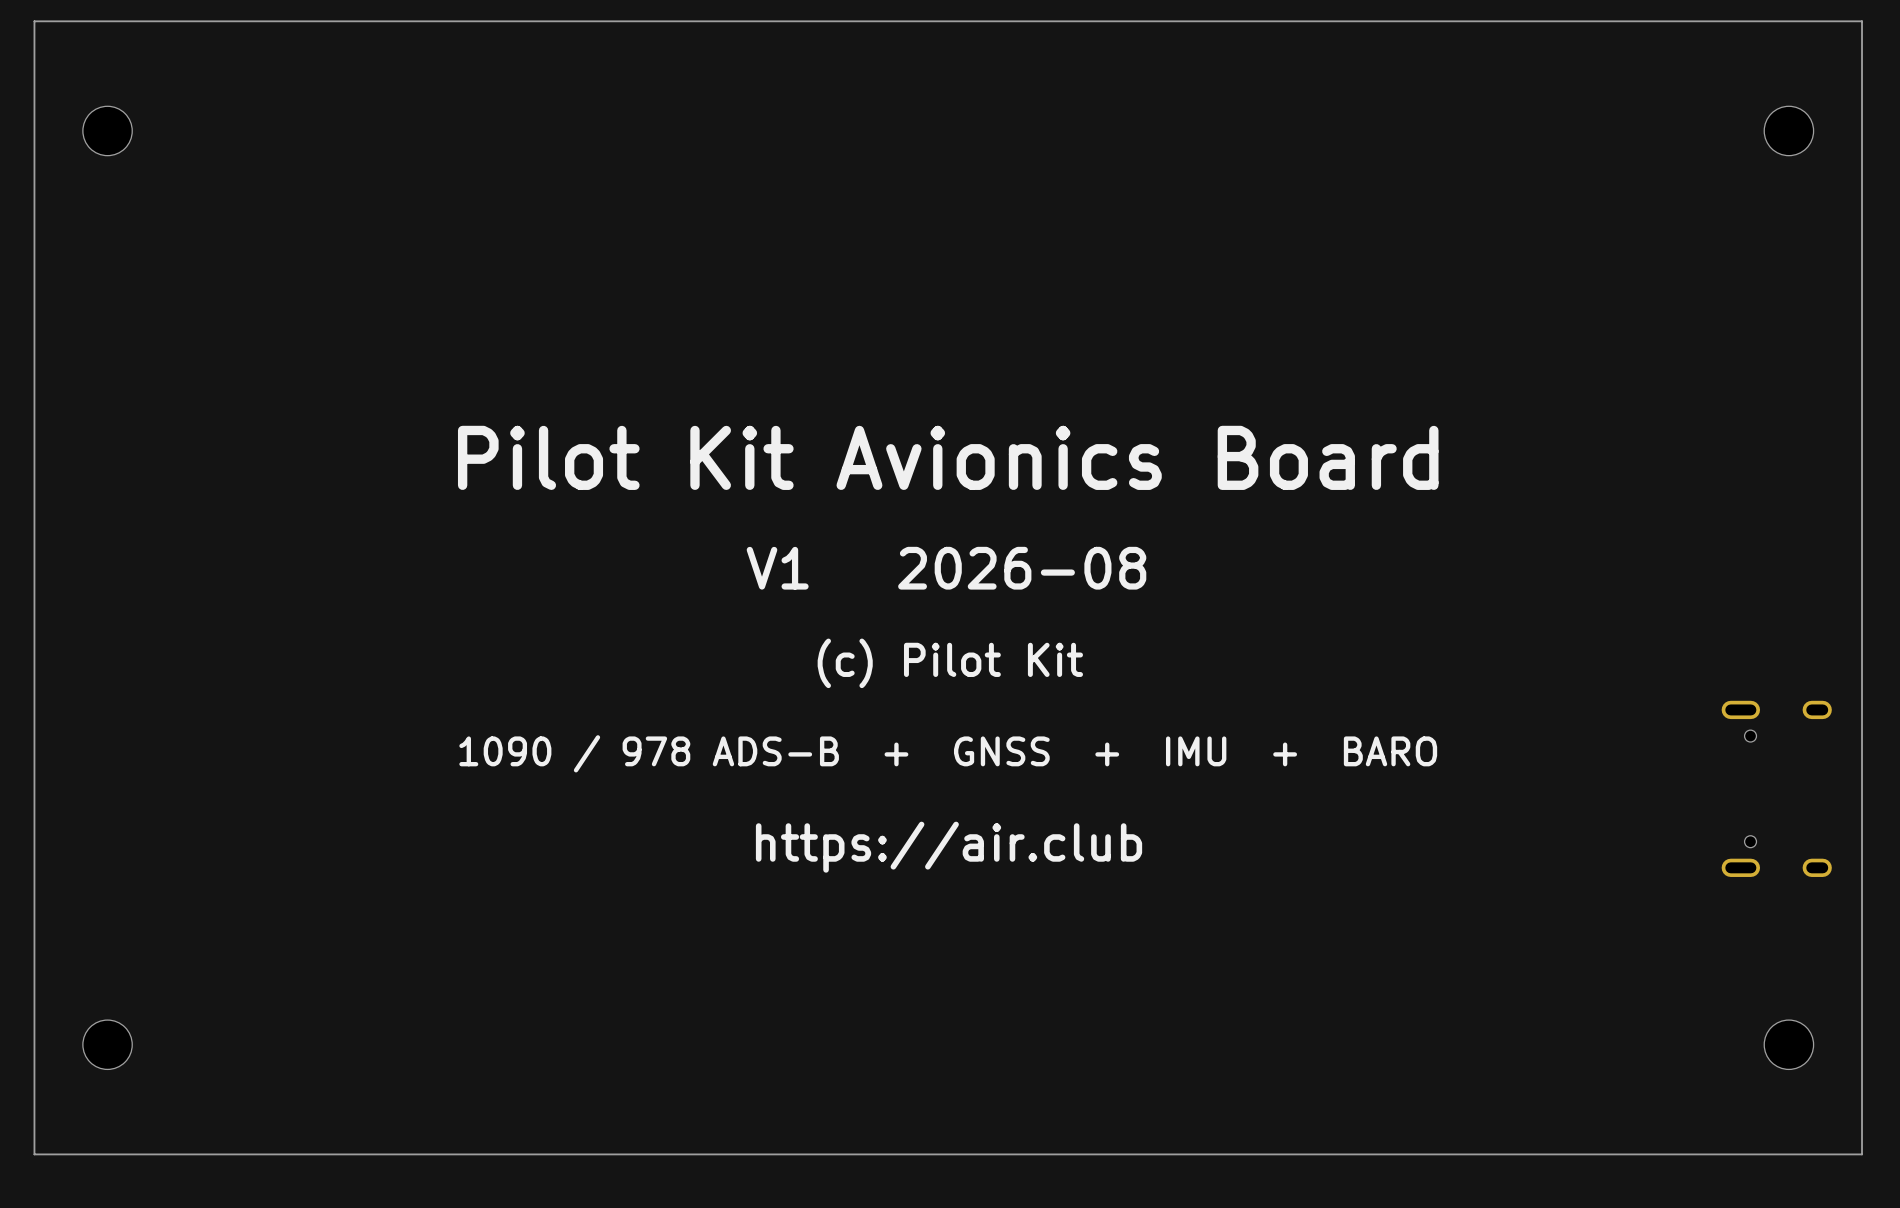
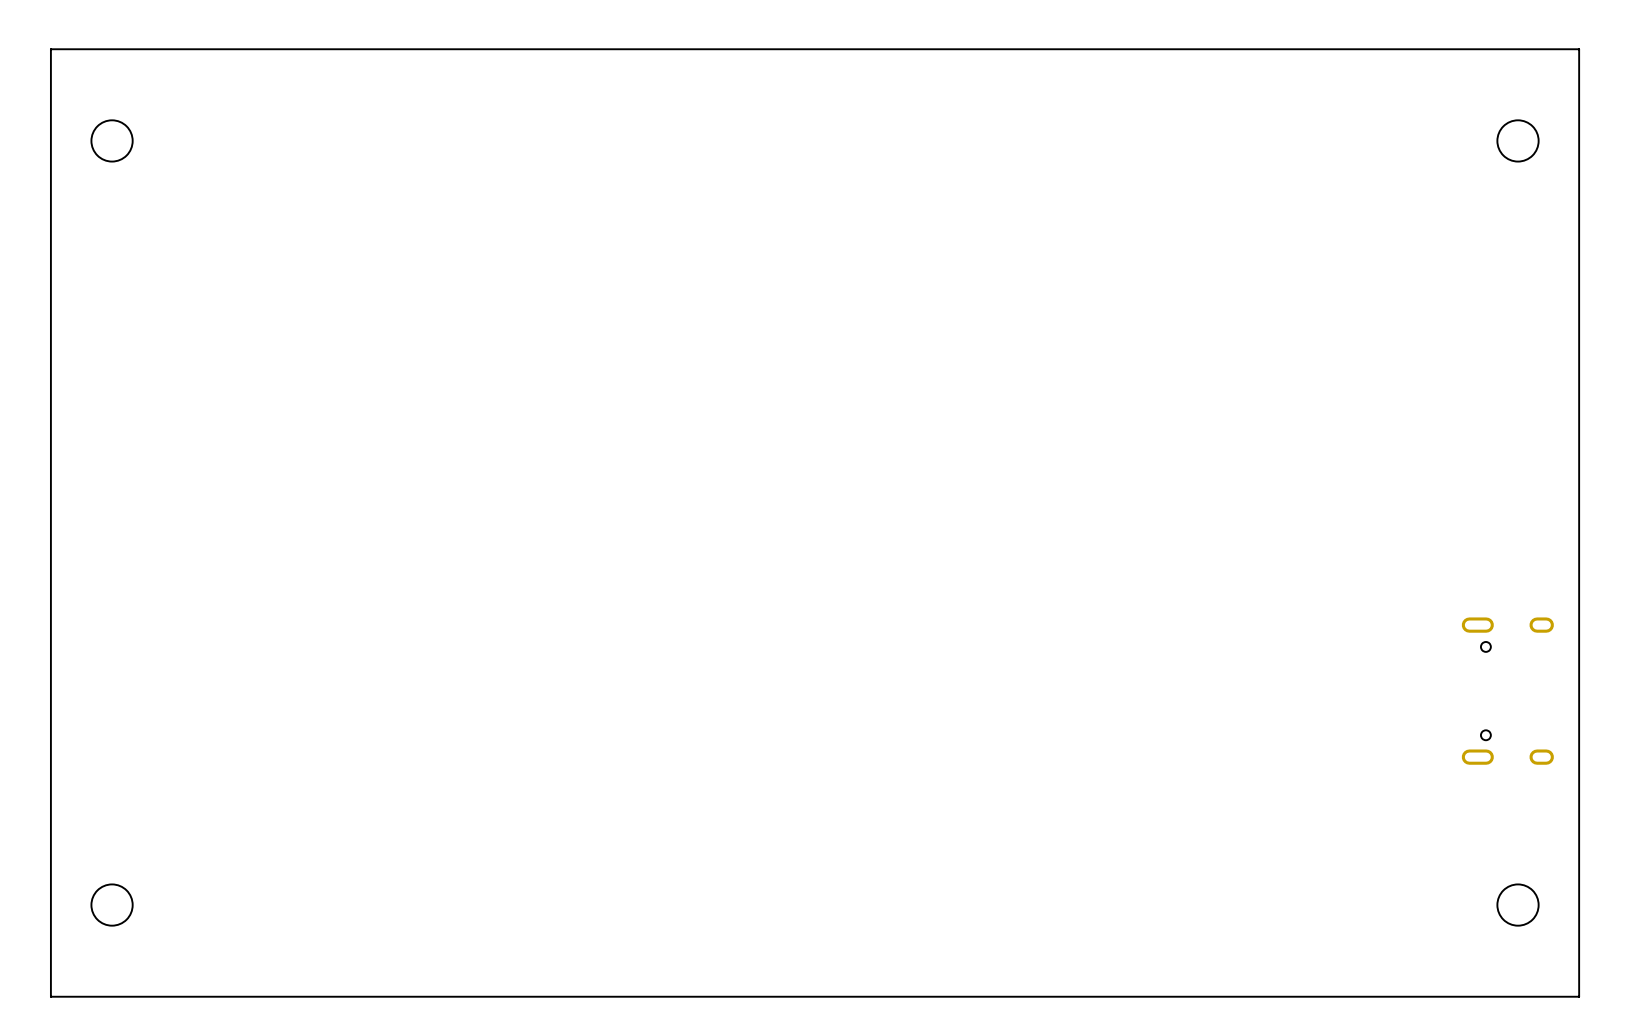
text: Pilot Kit Avionics Board (948, 457) -> none
text: V1 2026-08 (946, 568) -> none
text: (c) Pilot Kit (950, 663) -> none
text: 1090 / 978 ADS-B + GNSS + IMU + BARO (948, 753) -> none
text: https://air.club (949, 847) -> none

